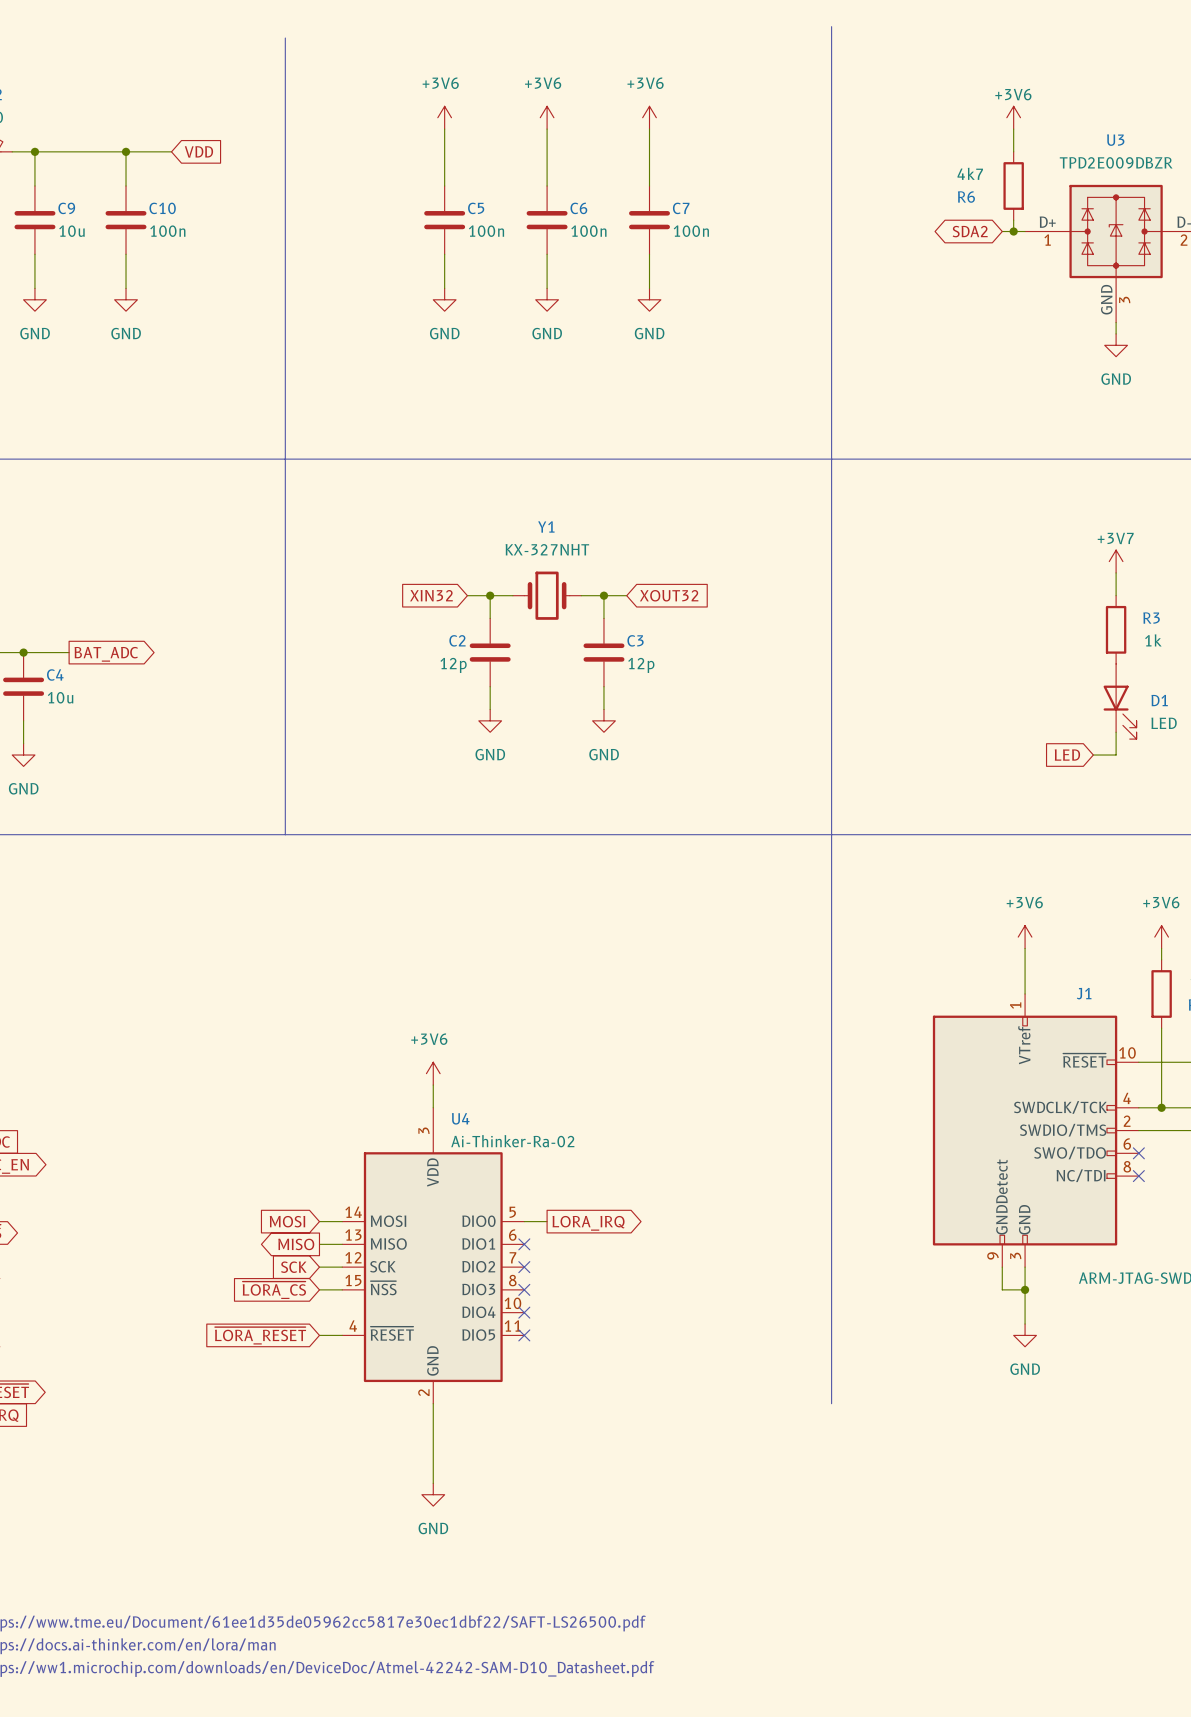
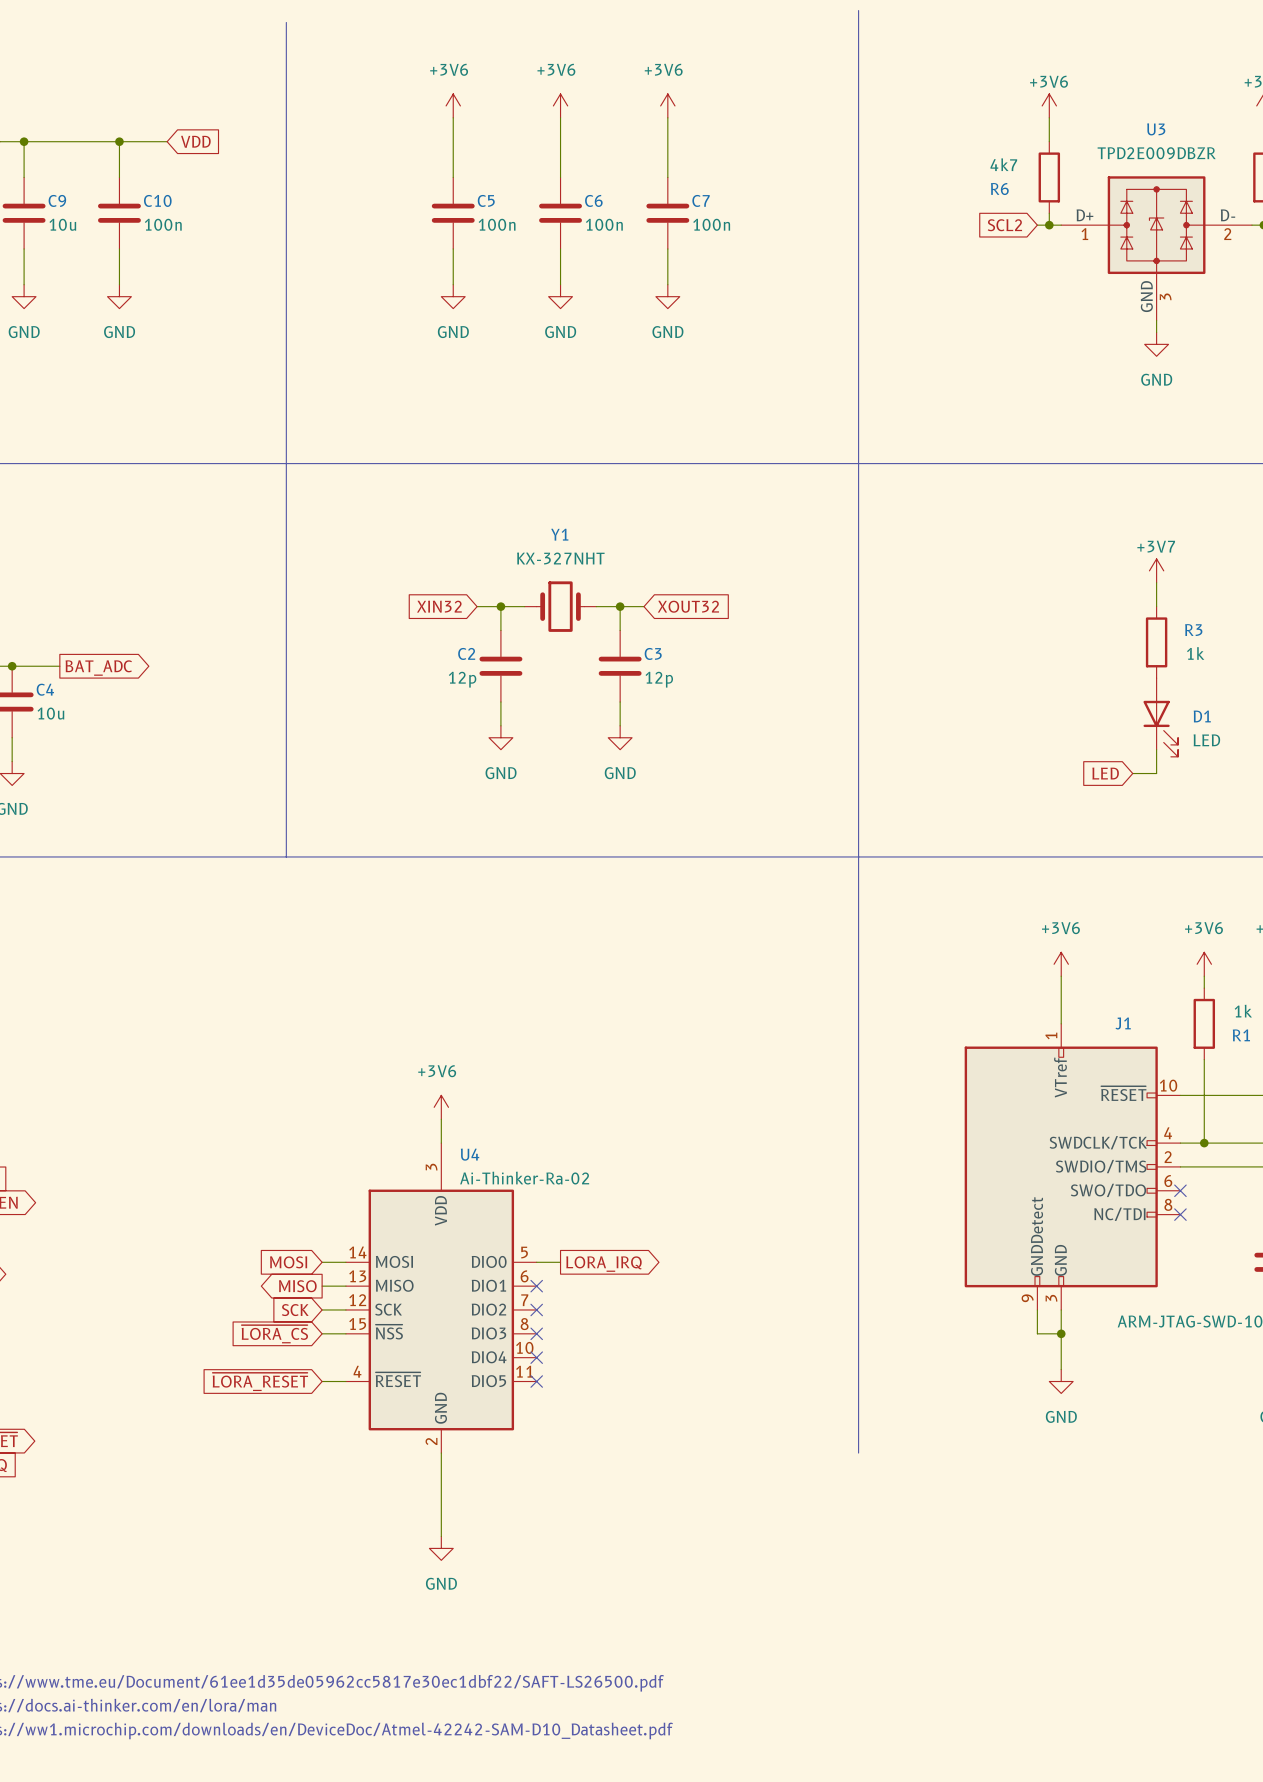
global label shape: bidirectional (970, 231) -> input (1004, 225)
global label: SDA2 (970, 231) -> SCL2 (1004, 225)

